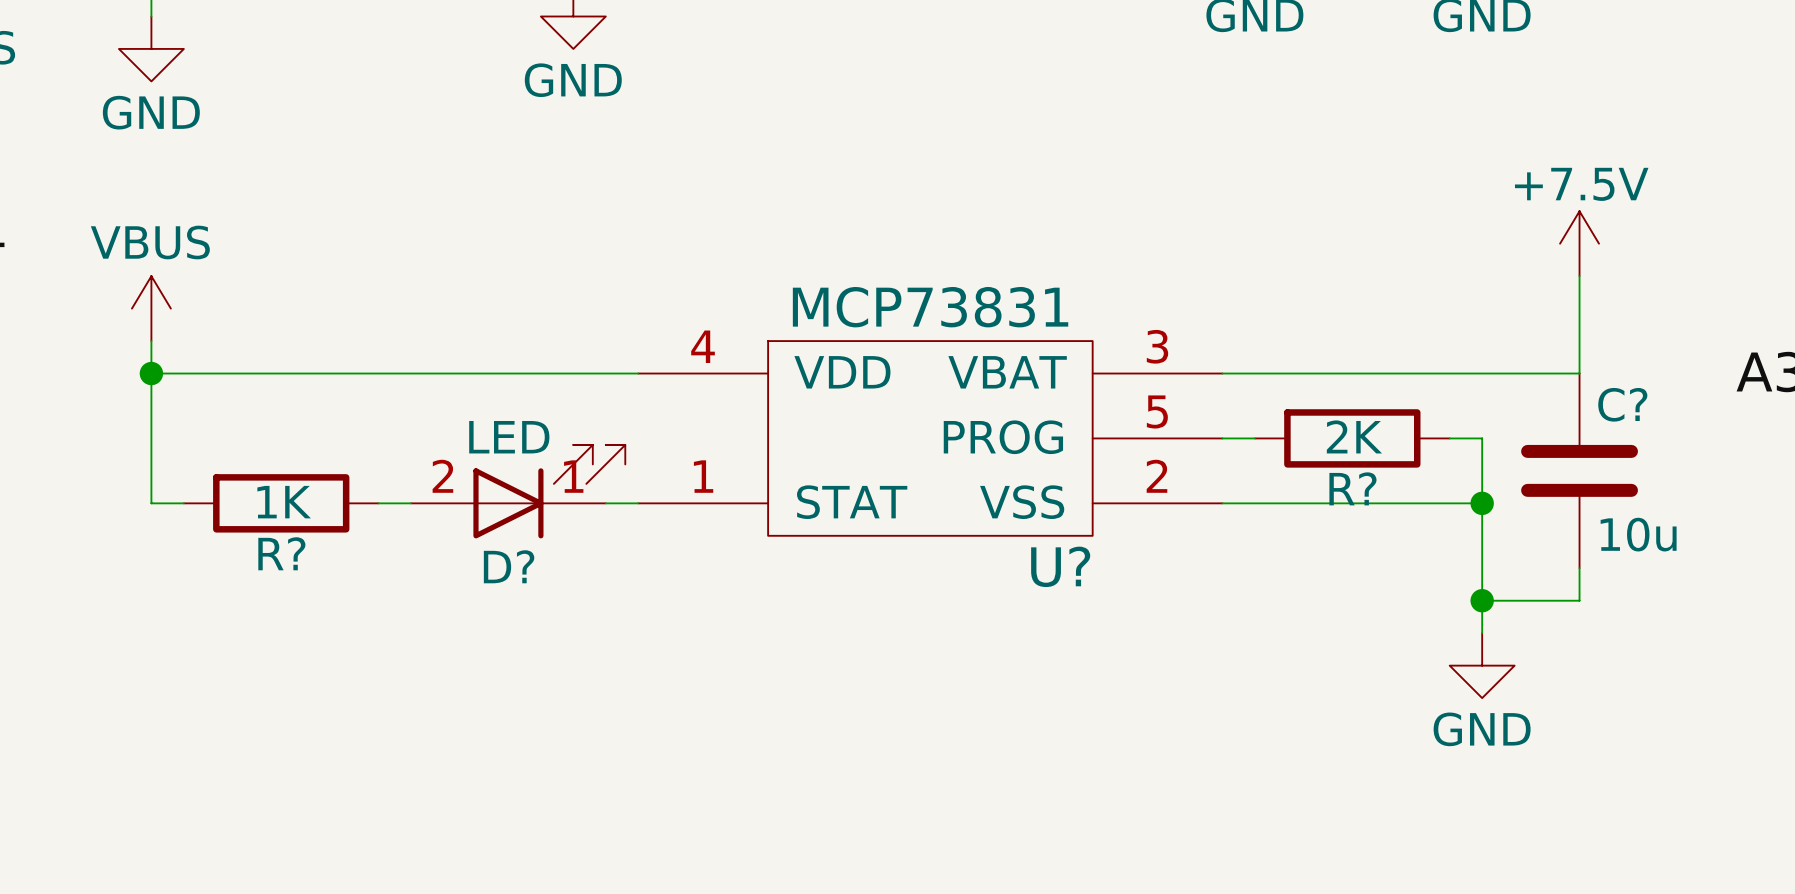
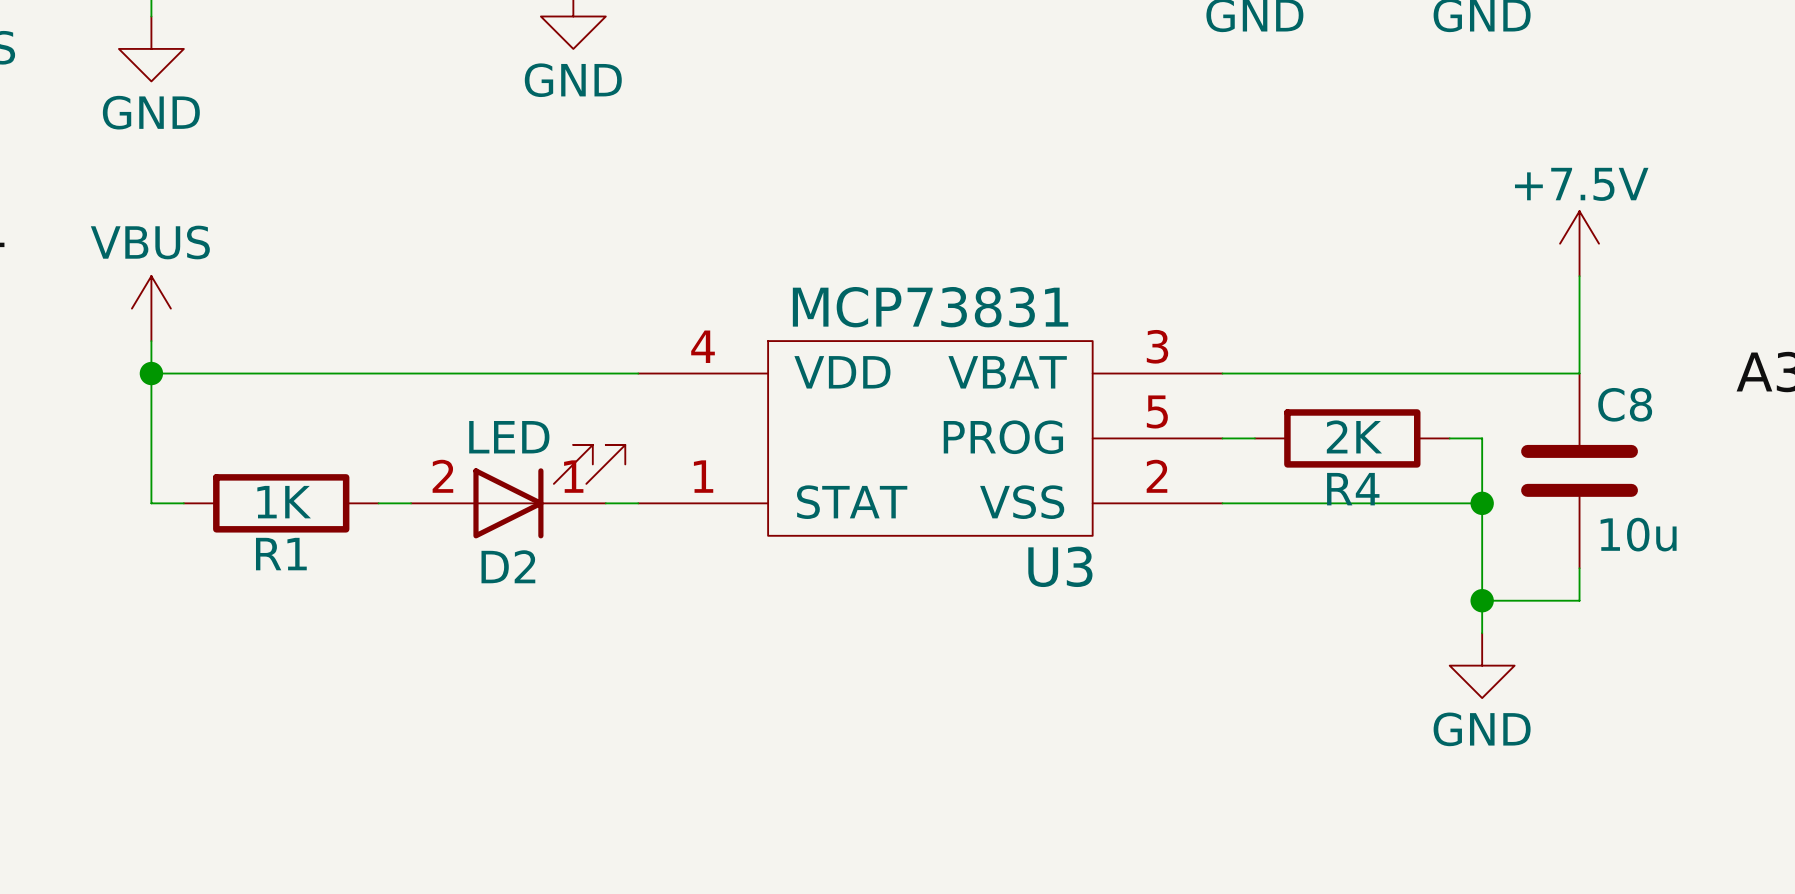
C? name: C? (1622, 404) -> C8 (1625, 404)
R? name: R? (1352, 488) -> R4 (1353, 489)
R? name: R? (281, 553) -> R1 (281, 554)
D? name: D? (509, 566) -> D2 (508, 566)
U? name: U? (1060, 566) -> U3 (1060, 566)

